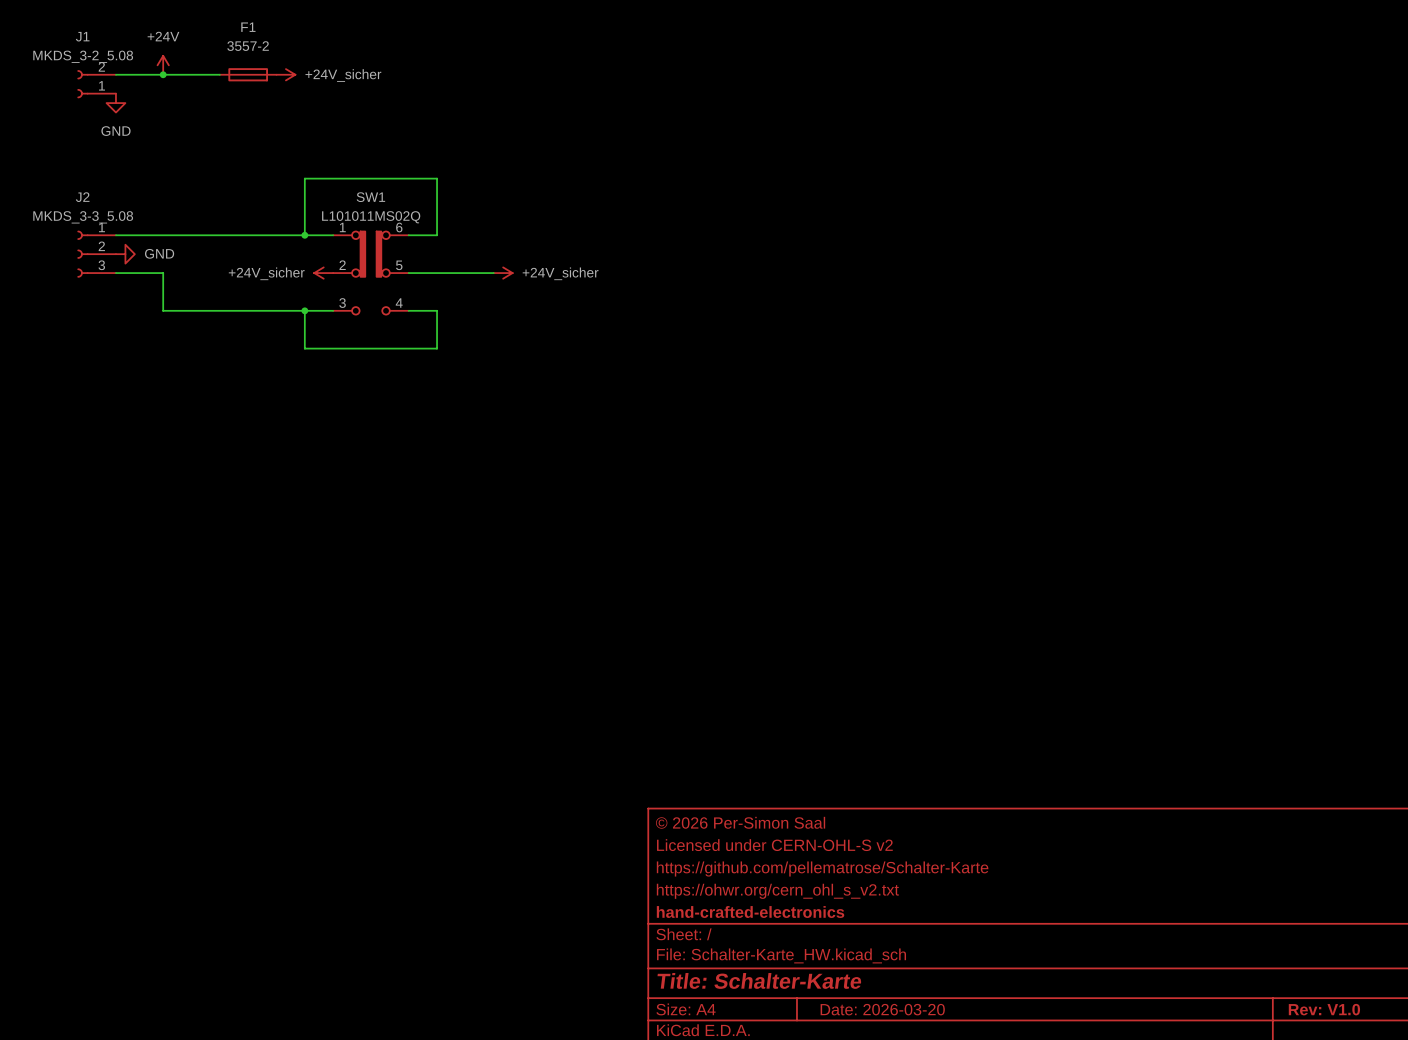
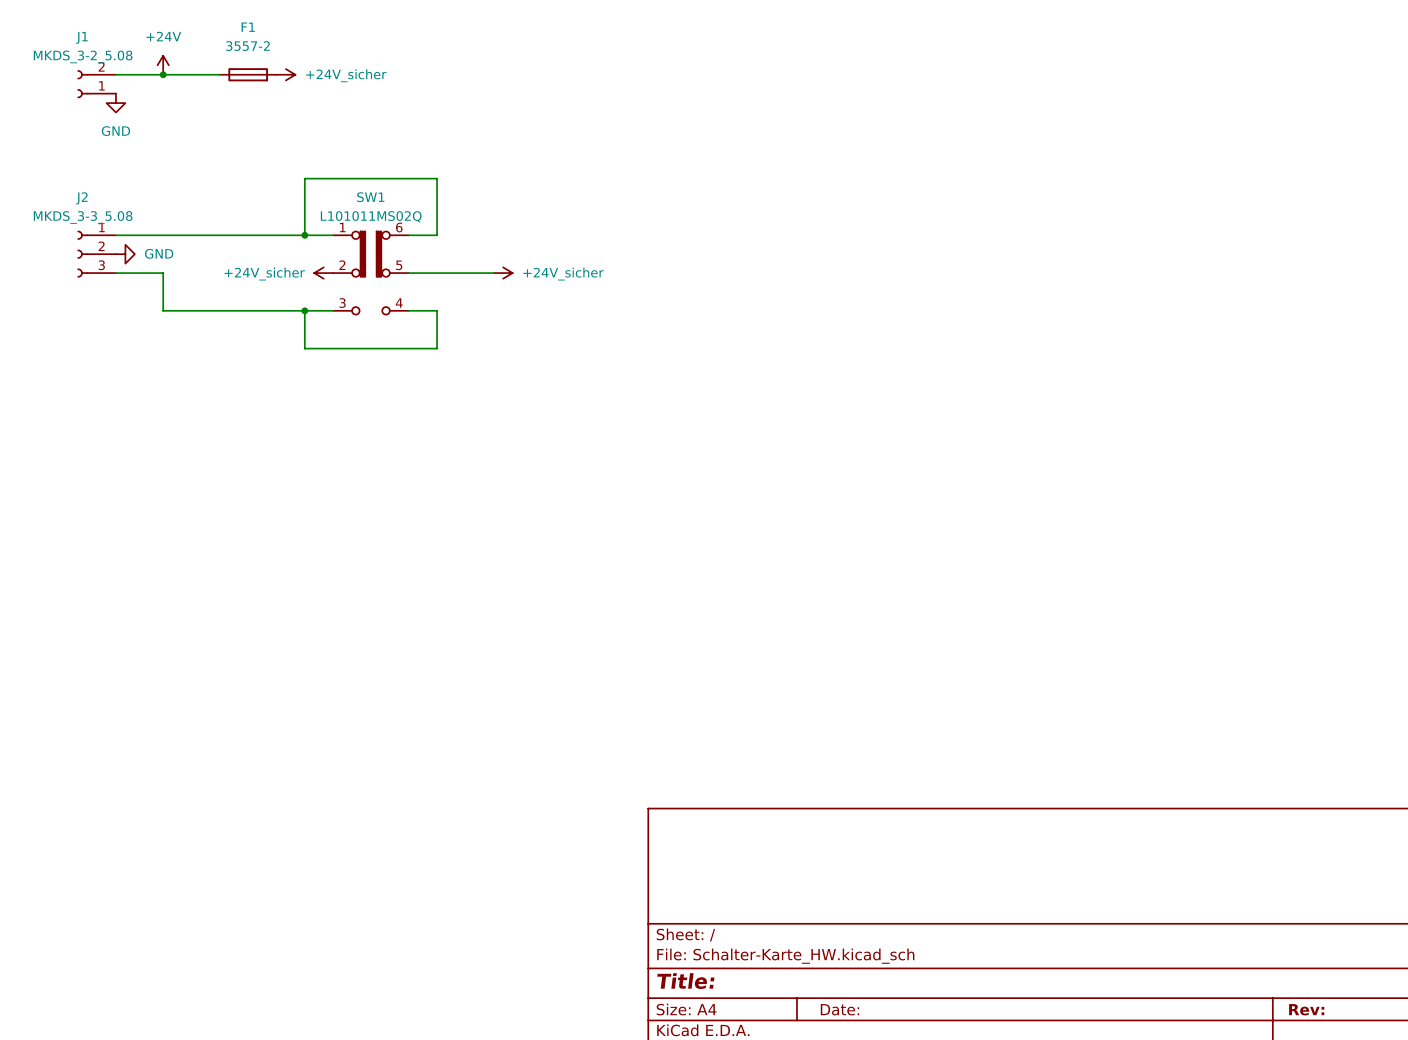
title block: © 2026 Per-Simon Saal (740, 822) -> none
title block: Licensed under CERN-OHL-S v2 (774, 845) -> none
title block: https://github.com/pellematrose/Schalter-Karte (822, 869) -> none
title block: https://ohwr.org/cern_ohl_s_v2.txt (777, 891) -> none
title block: hand-crafted-electronics (750, 912) -> none
title block: Title: Schalter-Karte (759, 980) -> Title: (685, 981)
title block: Date: 2026-03-20 (882, 1009) -> Date: (840, 1009)
title block: Rev: V1.0 (1324, 1009) -> Rev: (1306, 1009)

